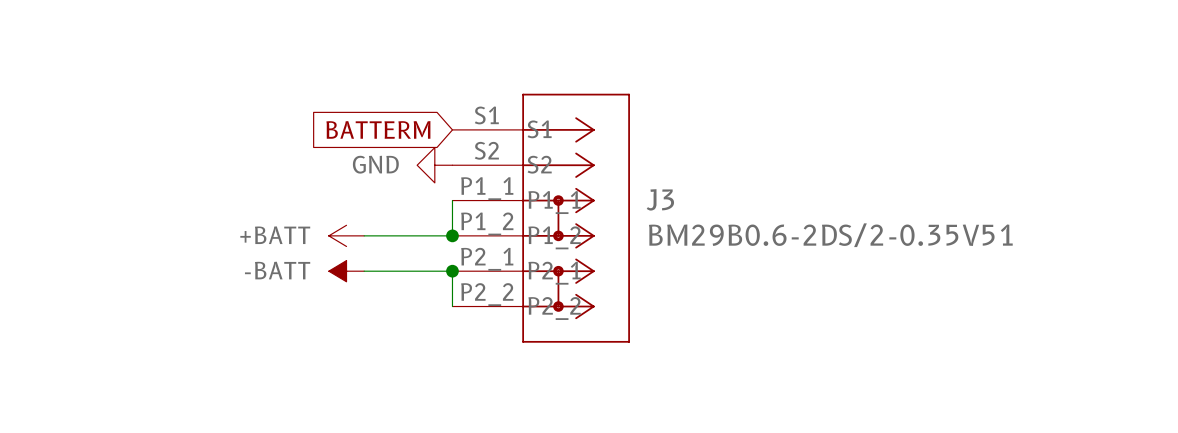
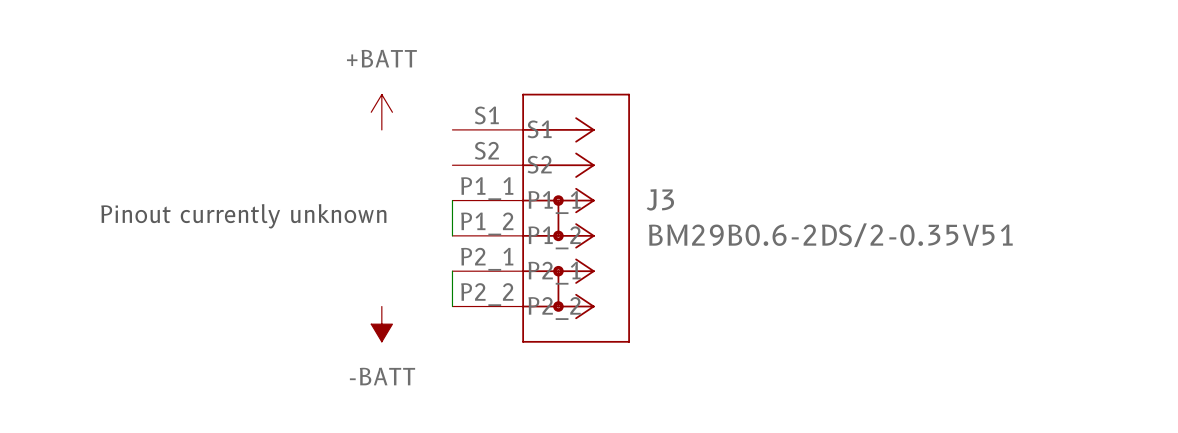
global label: BATTERM (378, 129) -> none
power symbol: GND (434, 165) -> none
text: none -> Pinout currently unknown (243, 216)
power symbol text position: +BATT (275, 235) -> +BATT (381, 58)
power symbol rotation: 0° (346, 235) -> 90° clockwise (381, 112)
power symbol position: +BATT (346, 235) -> +BATT (381, 112)
wire: (364, 235) (452, 235) -> none
junction: (452, 235) -> none
power symbol text position: -BATT (277, 270) -> -BATT (382, 376)
power symbol rotation: 0° (346, 271) -> 90° counterclockwise (381, 324)
power symbol position: -BATT (346, 271) -> -BATT (381, 324)
wire: (364, 271) (452, 271) -> none
junction: (452, 271) -> none

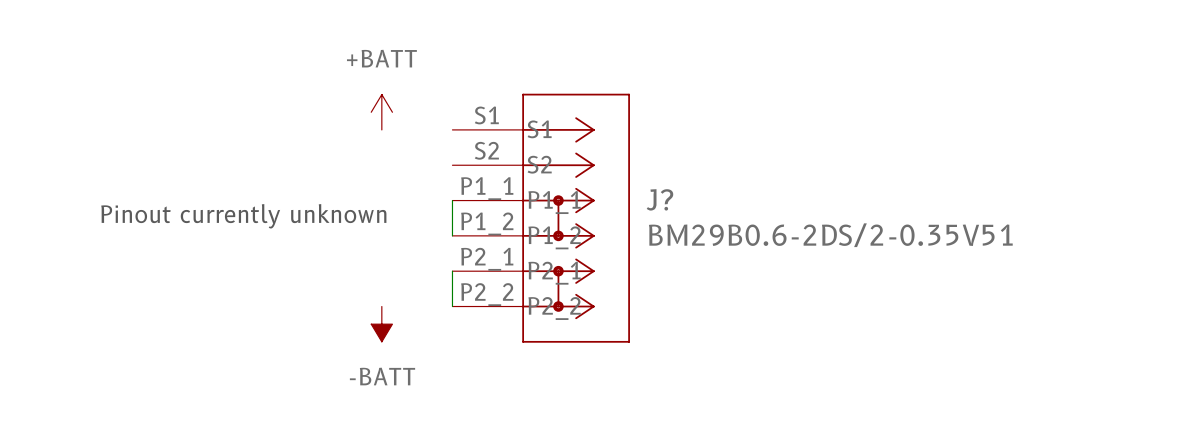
J3 name: J3 (660, 199) -> J? (659, 199)

